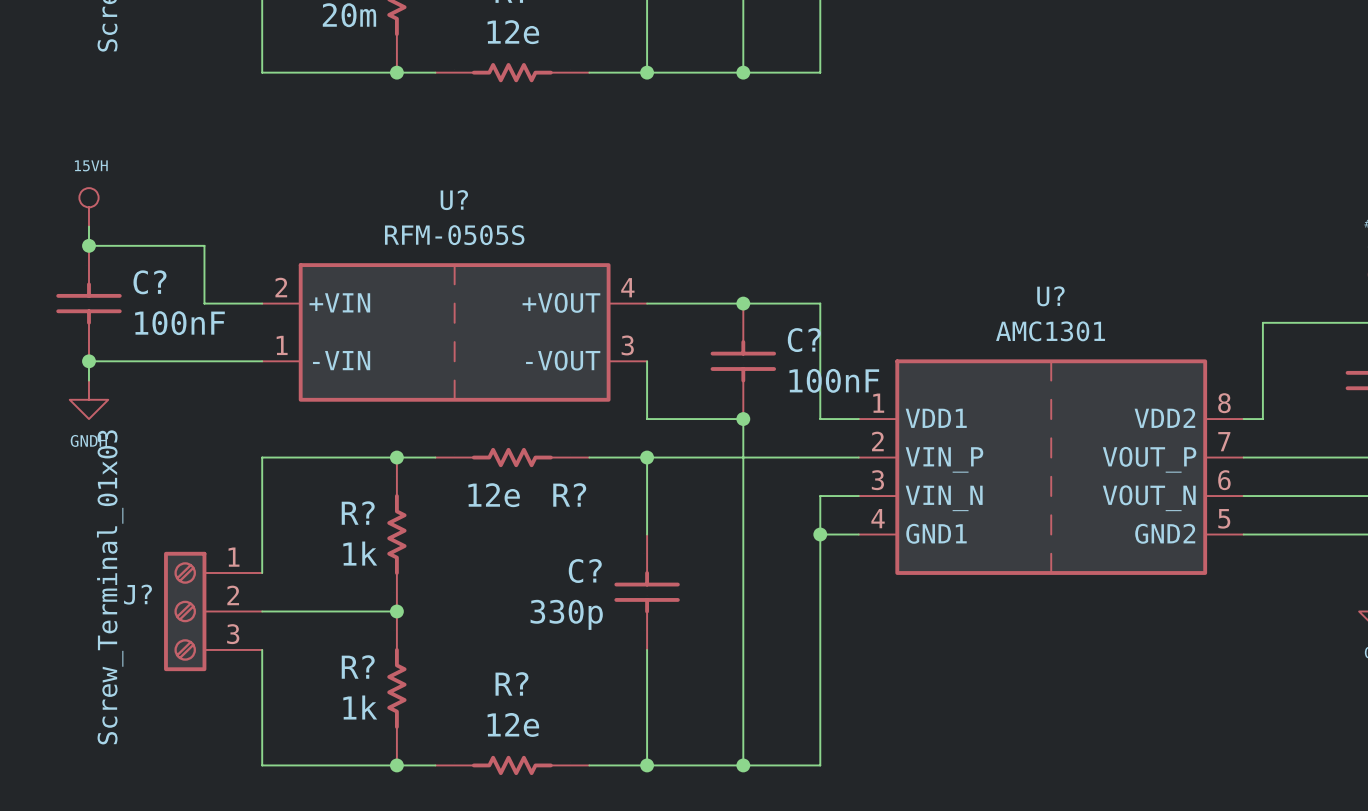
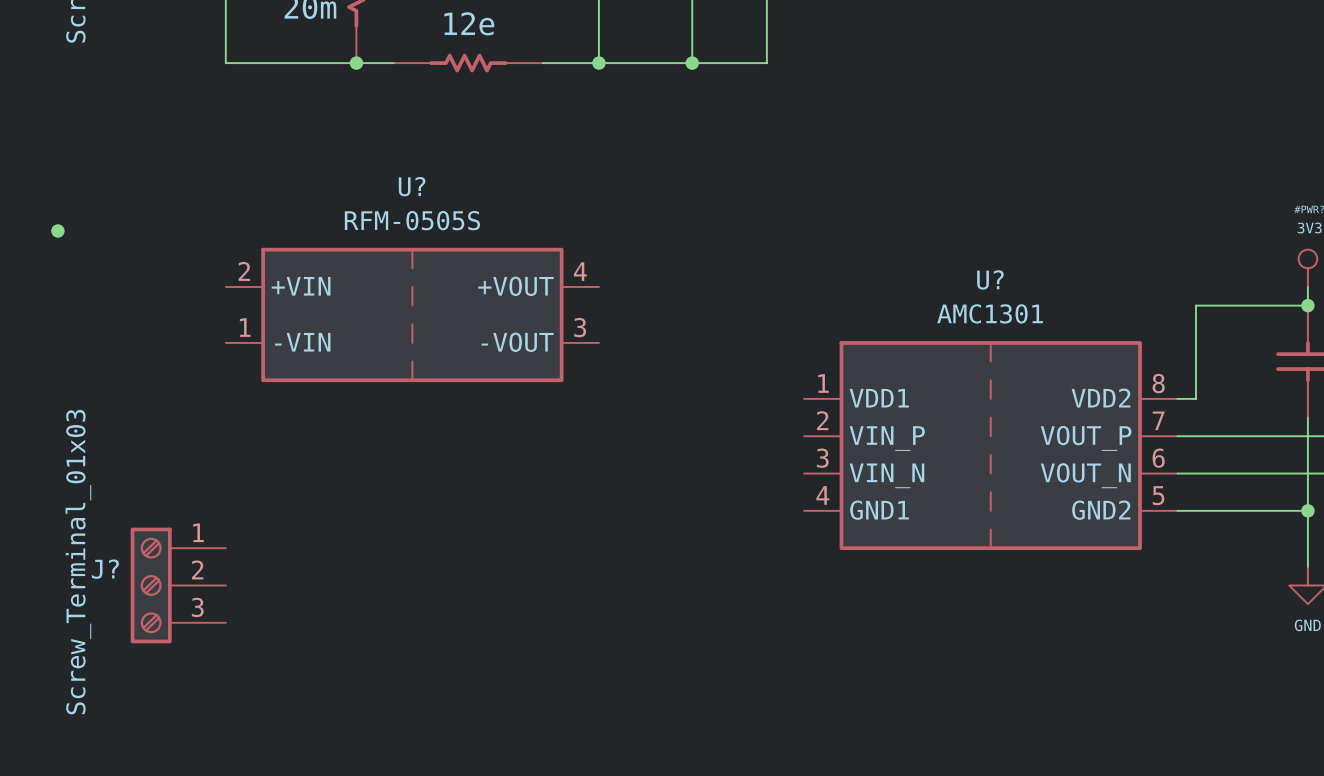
power symbol: 15VH (88, 207) -> none
wire: (88, 226) (88, 245) (204, 245) (204, 303) (262, 303) -> none
C?: 100nF (88, 303) -> none
wire: (647, 303) (820, 303) (820, 419) (858, 419) -> none
junction: (743, 303) -> none
junction: (88, 361) -> none
wire: (262, 361) (88, 361) (88, 380) -> none
wire: (647, 361) (647, 419) (743, 419) (743, 765) -> none
C?: 100nF (743, 361) -> none
power symbol: GNDH (88, 399) -> none
junction: (743, 419) -> none
junction: (396, 457) -> none
wire: (435, 457) (262, 457) (262, 573) -> none
R?: 12e (512, 457) -> none
wire: (589, 457) (858, 457) -> none
wire: (647, 457) (647, 534) -> none
junction: (647, 457) -> none
wire: (858, 496) (820, 496) (820, 765) (589, 765) -> none
R?: 1k (396, 534) -> none
wire: (820, 534) (858, 534) -> none
junction: (820, 534) -> none
C?: 330p (647, 592) -> none
wire: (262, 611) (396, 611) -> none
junction: (396, 611) -> none
wire: (262, 649) (262, 765) (435, 765) -> none
wire: (647, 649) (647, 765) -> none
R?: 1k (396, 688) -> none
junction: (396, 765) -> none
R?: 12e (512, 765) -> none
junction: (647, 765) -> none
junction: (743, 765) -> none

